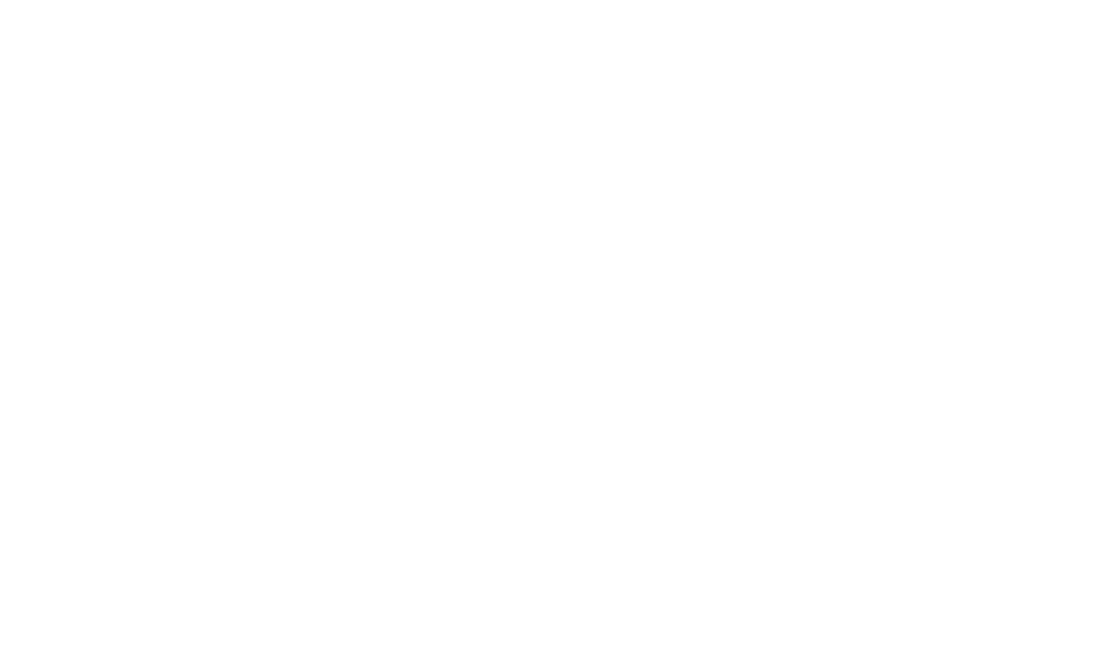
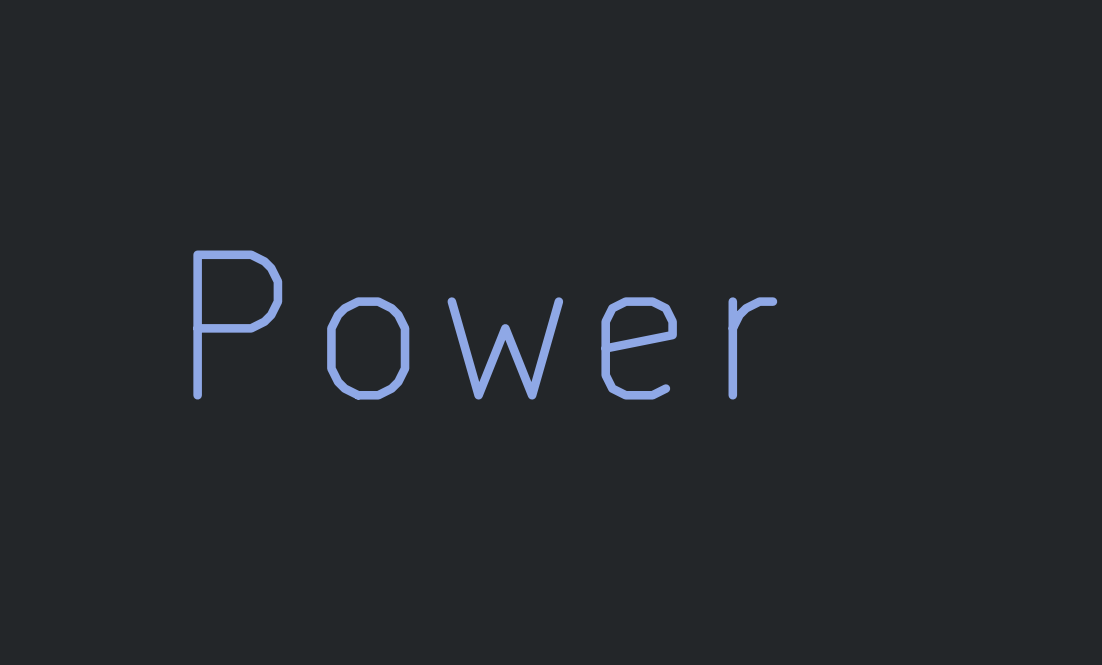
text: none -> Power (485, 325)

